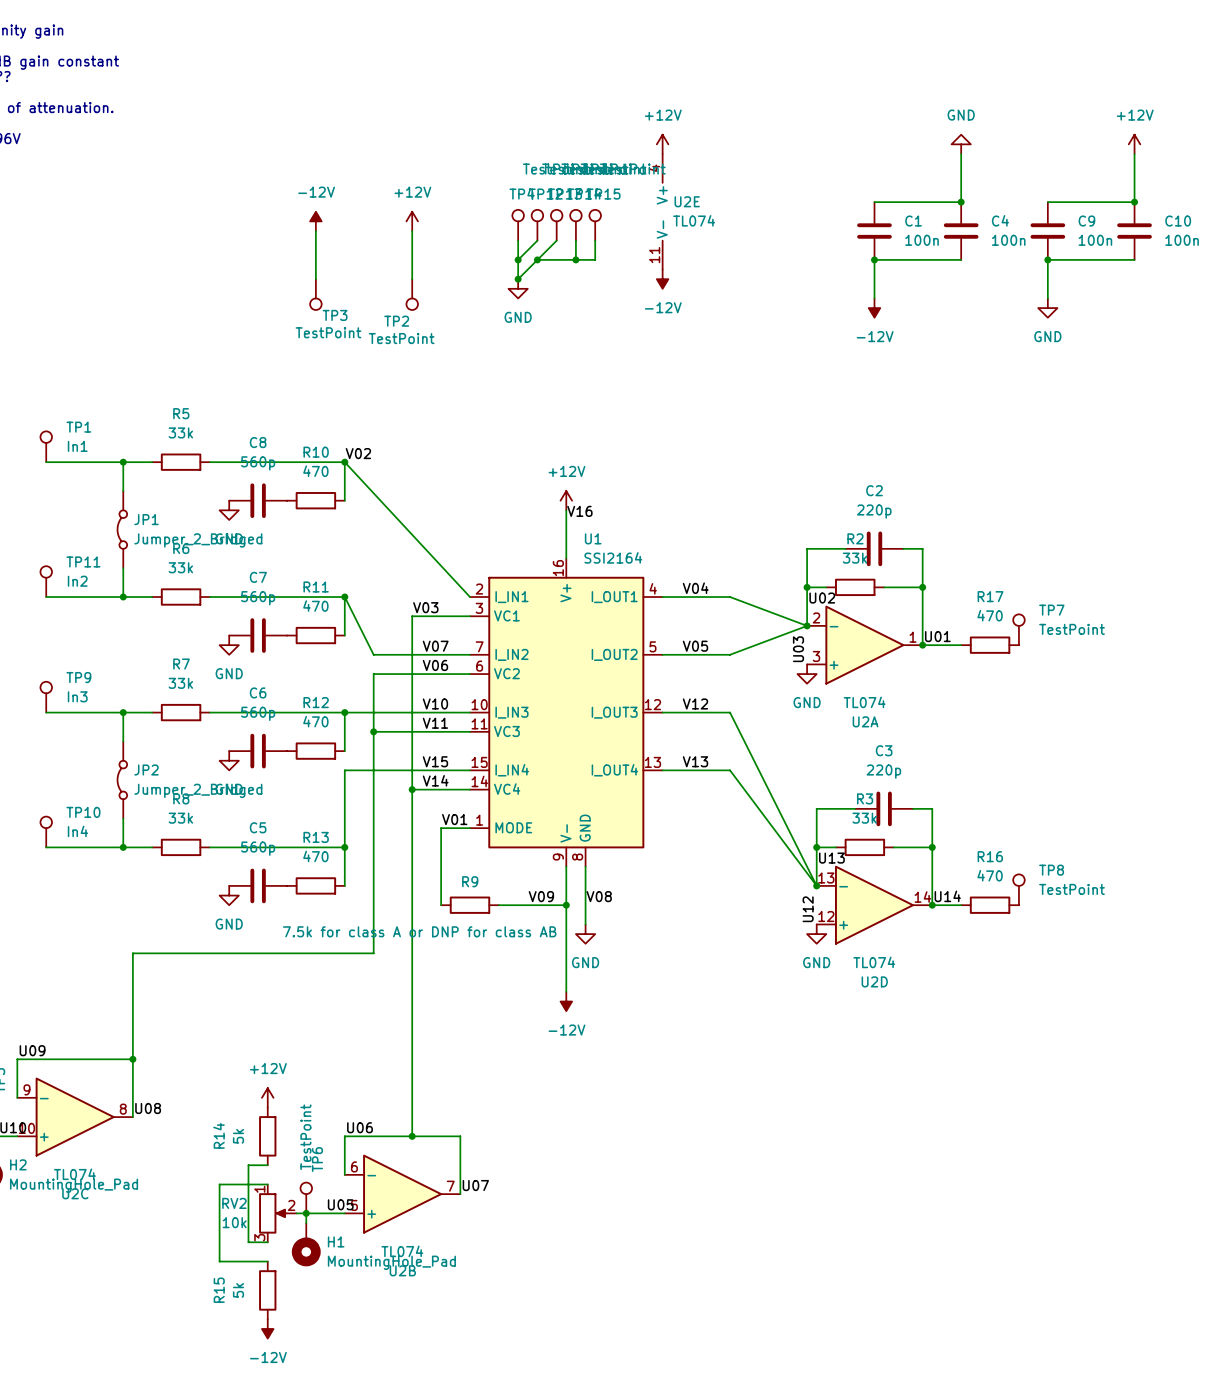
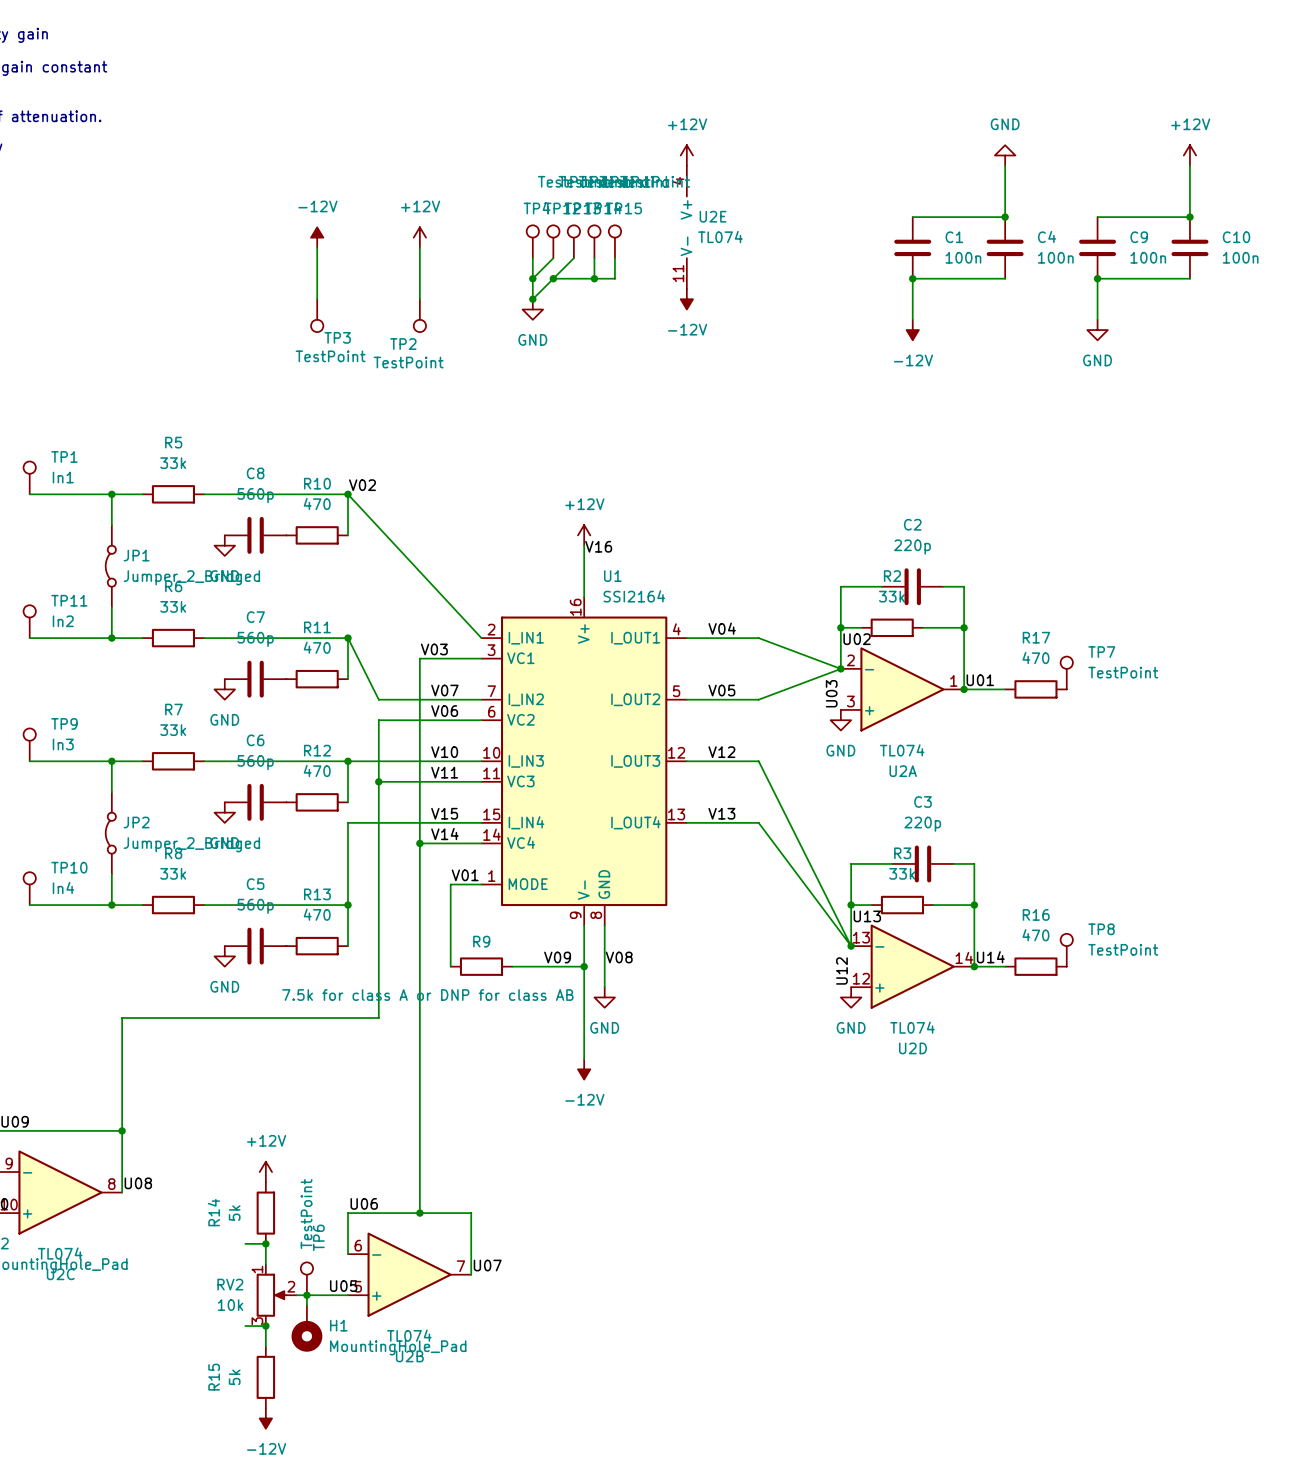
wire: (248, 1165) (248, 1242) -> none
wire: none -> (265, 1243) (265, 1264)
junction: none -> (265, 1243)
wire: (267, 1184) (219, 1184) (219, 1261) (267, 1261) -> (265, 1326) (265, 1346)
junction: none -> (265, 1326)

